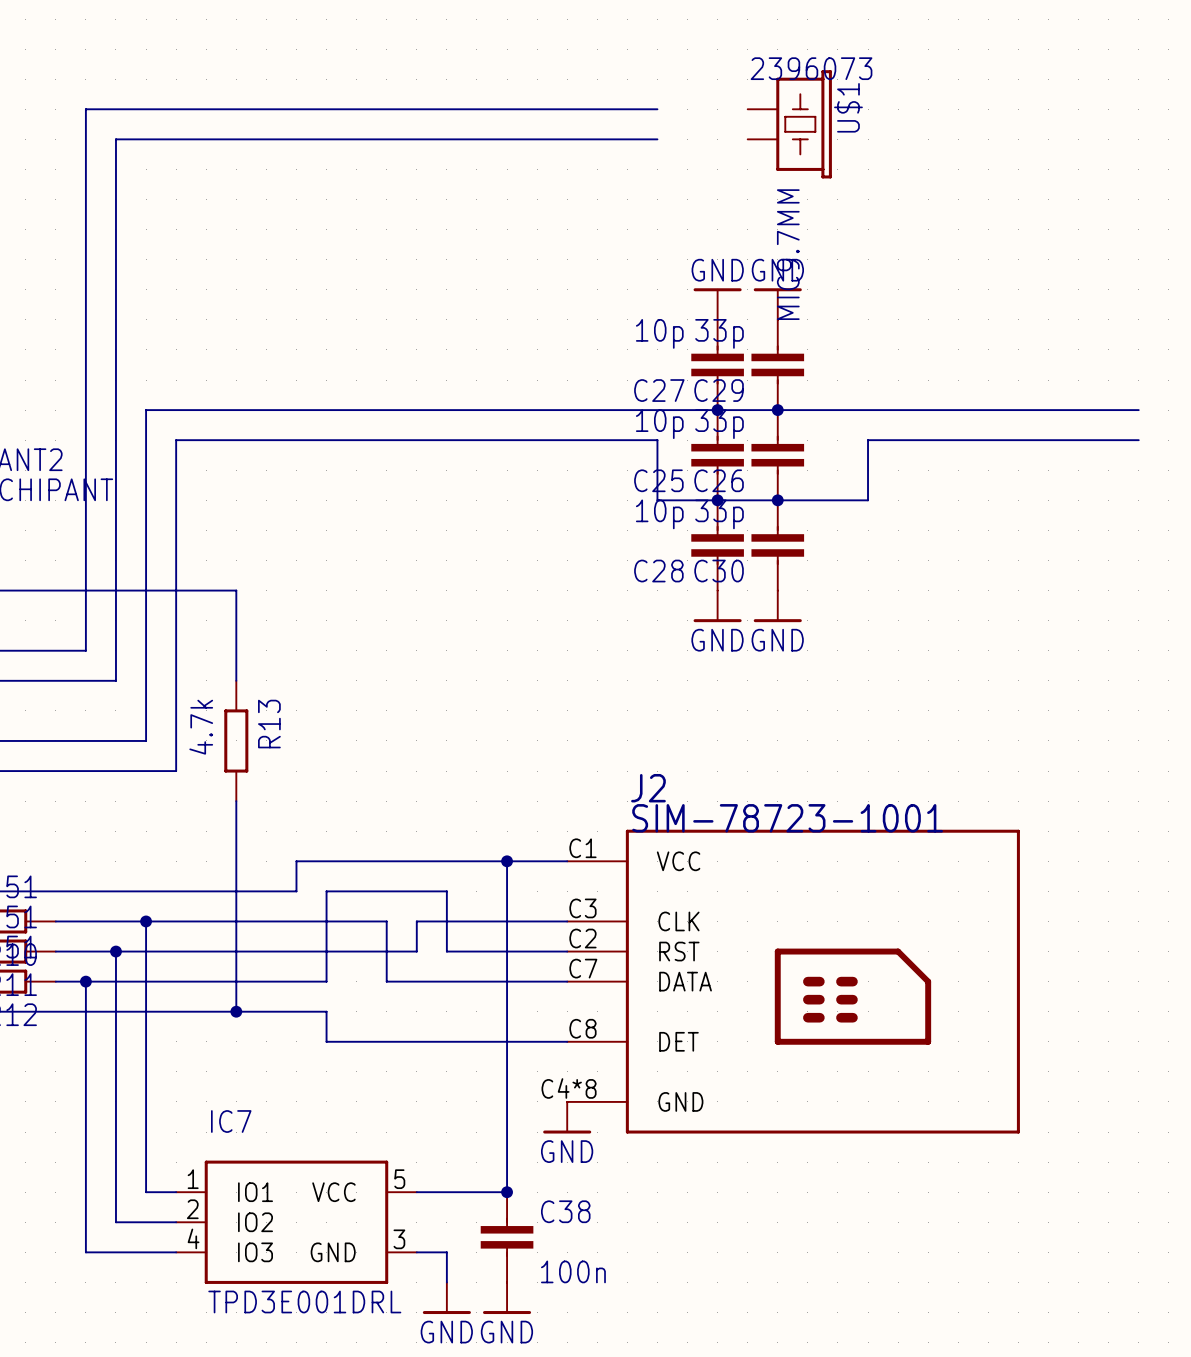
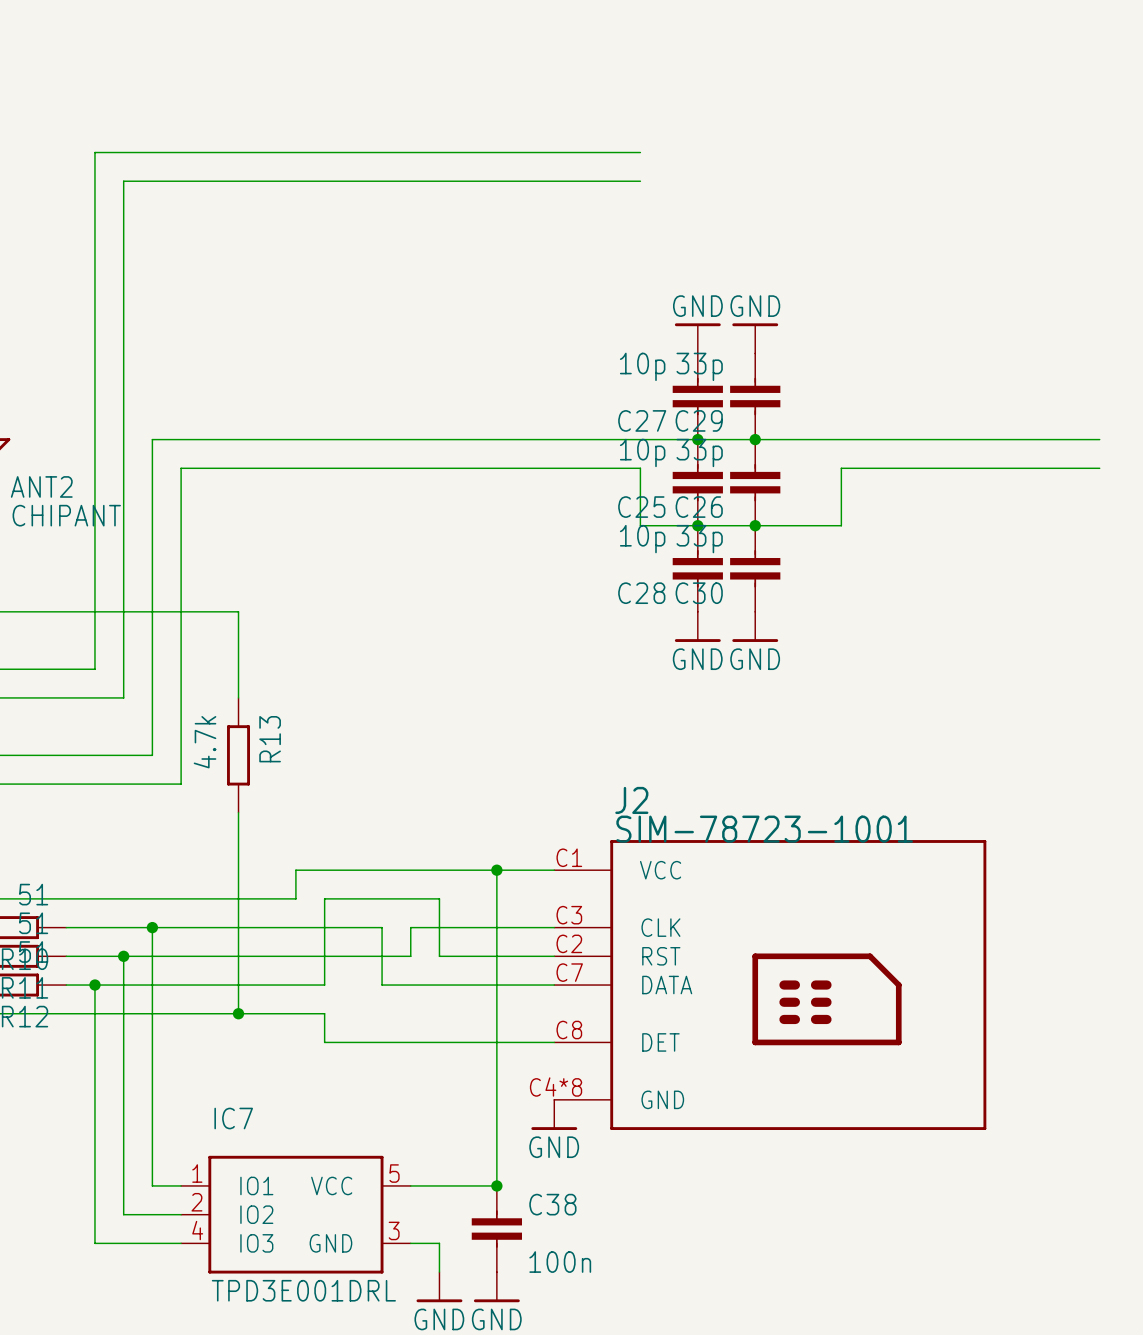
text: 2396073 (811, 68) -> none
U$1: MIC9.7MM (789, 124) -> none

